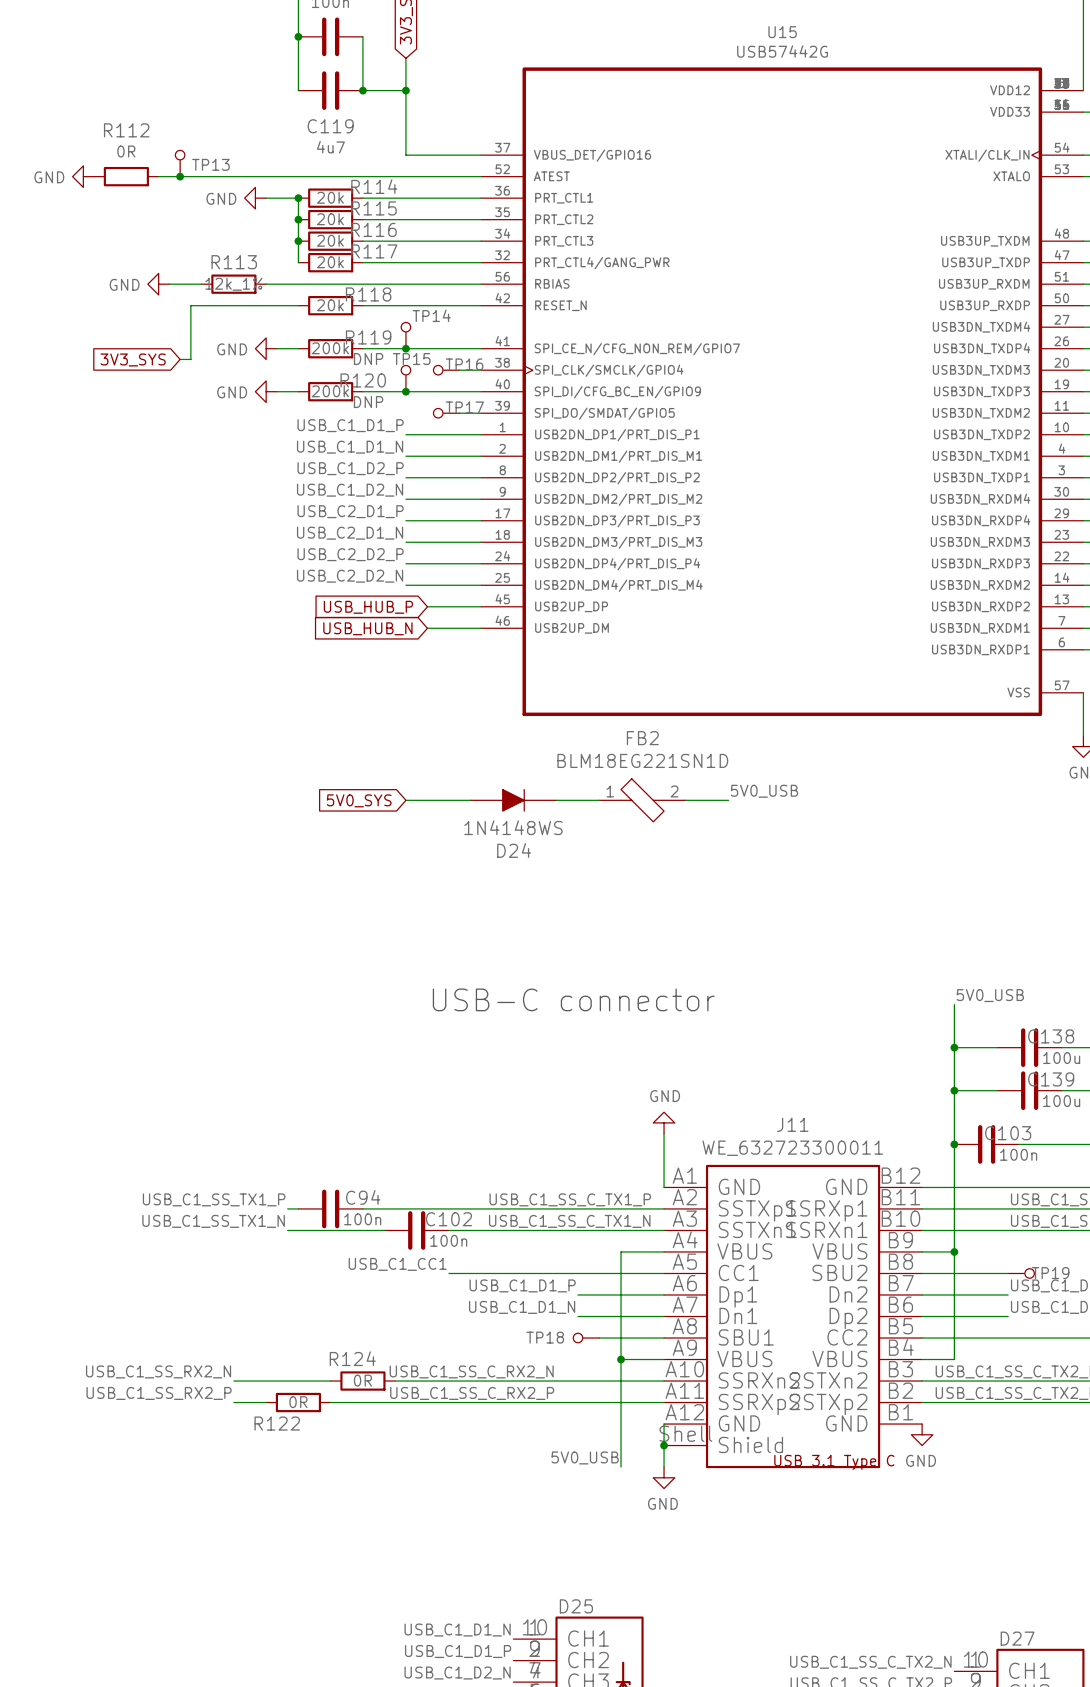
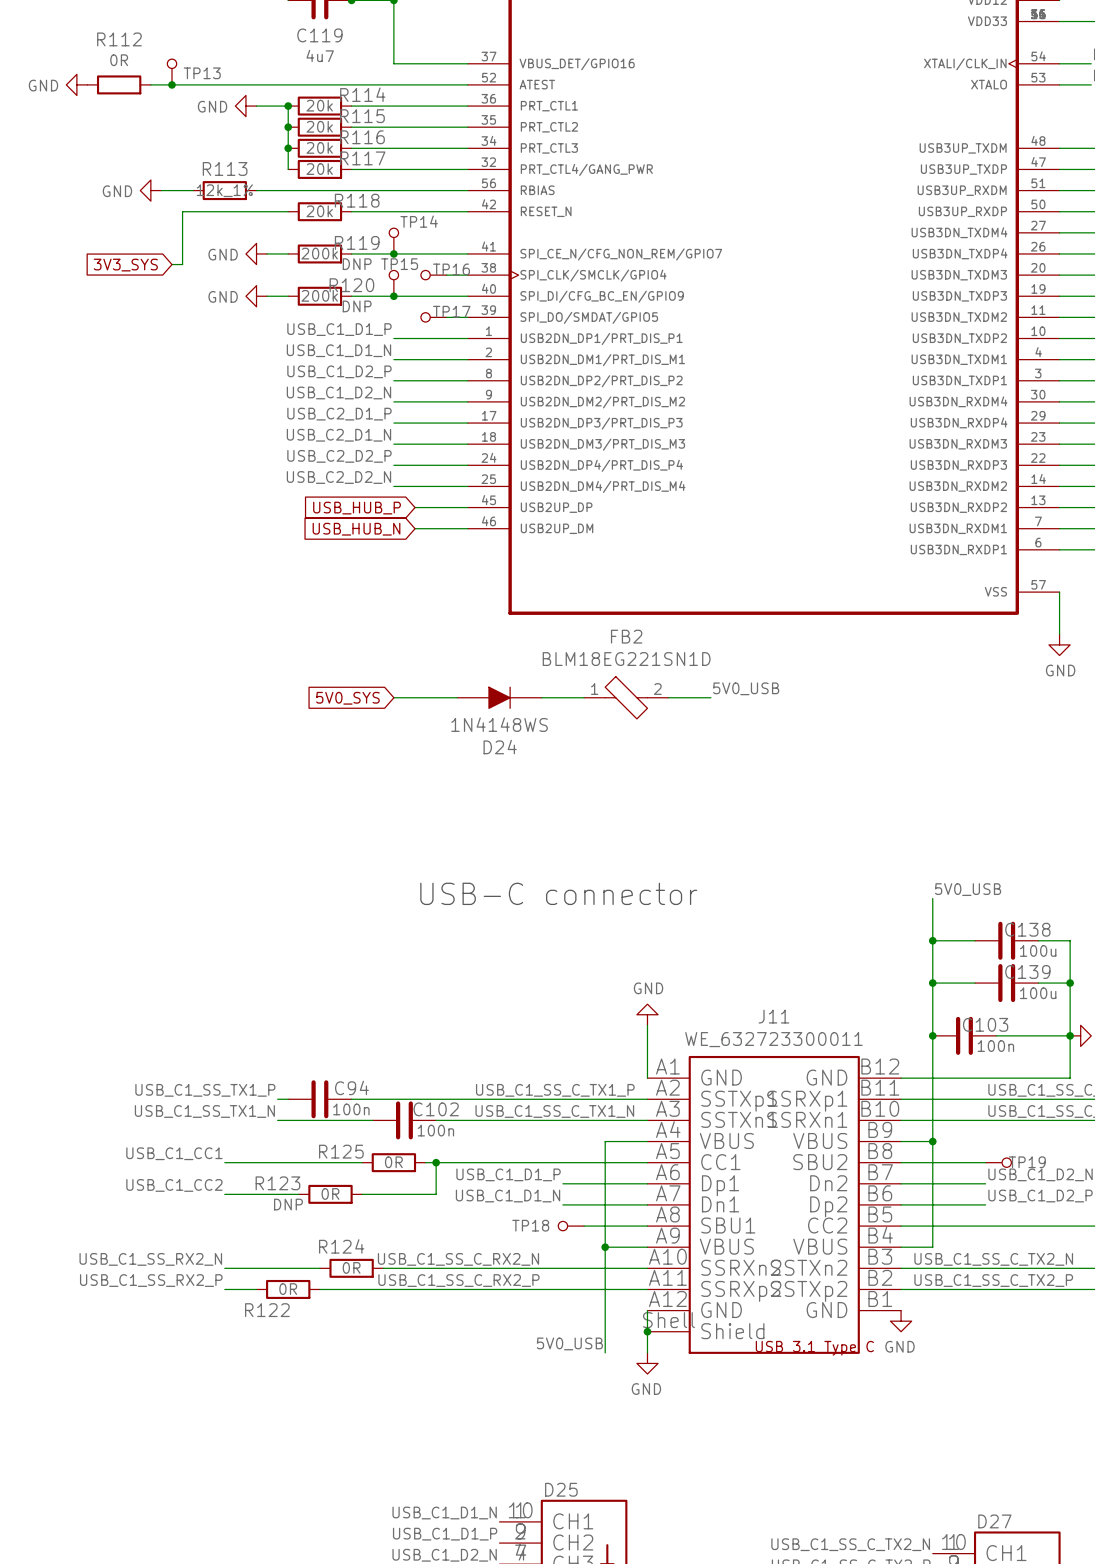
label: none -> USB_C1_CC1 (174, 1153)
label: USB_C1_CC1 (397, 1264) -> none
wire: none -> (224, 1162) (362, 1162)
R125: none -> (393, 1162)
wire: none -> (425, 1162) (436, 1162) (436, 1194) (362, 1194)
junction: none -> (436, 1162)
label: none -> USB_C1_CC2 (174, 1185)
wire: none -> (224, 1194) (298, 1194)
R123: none -> (330, 1194)

